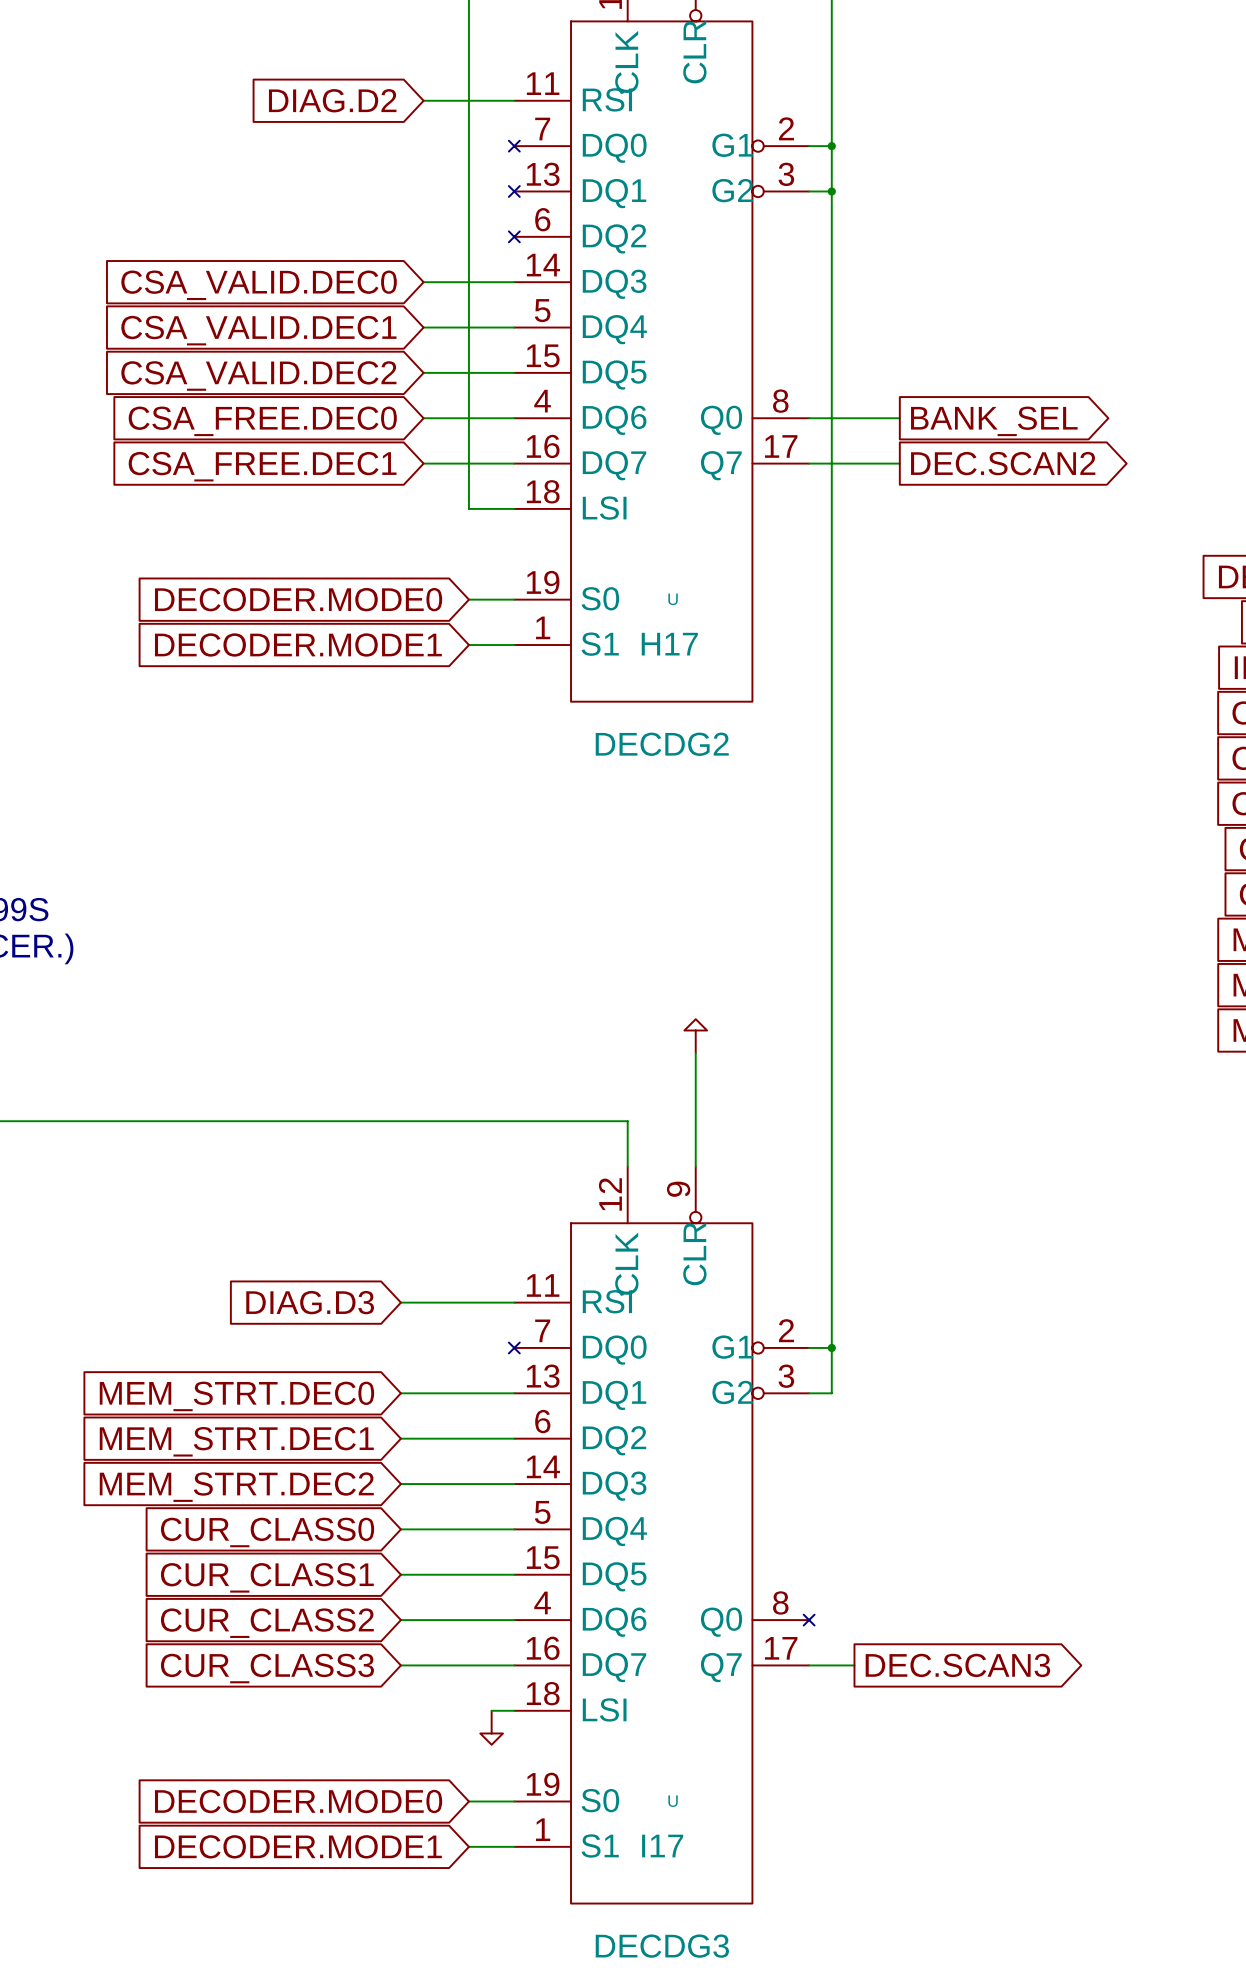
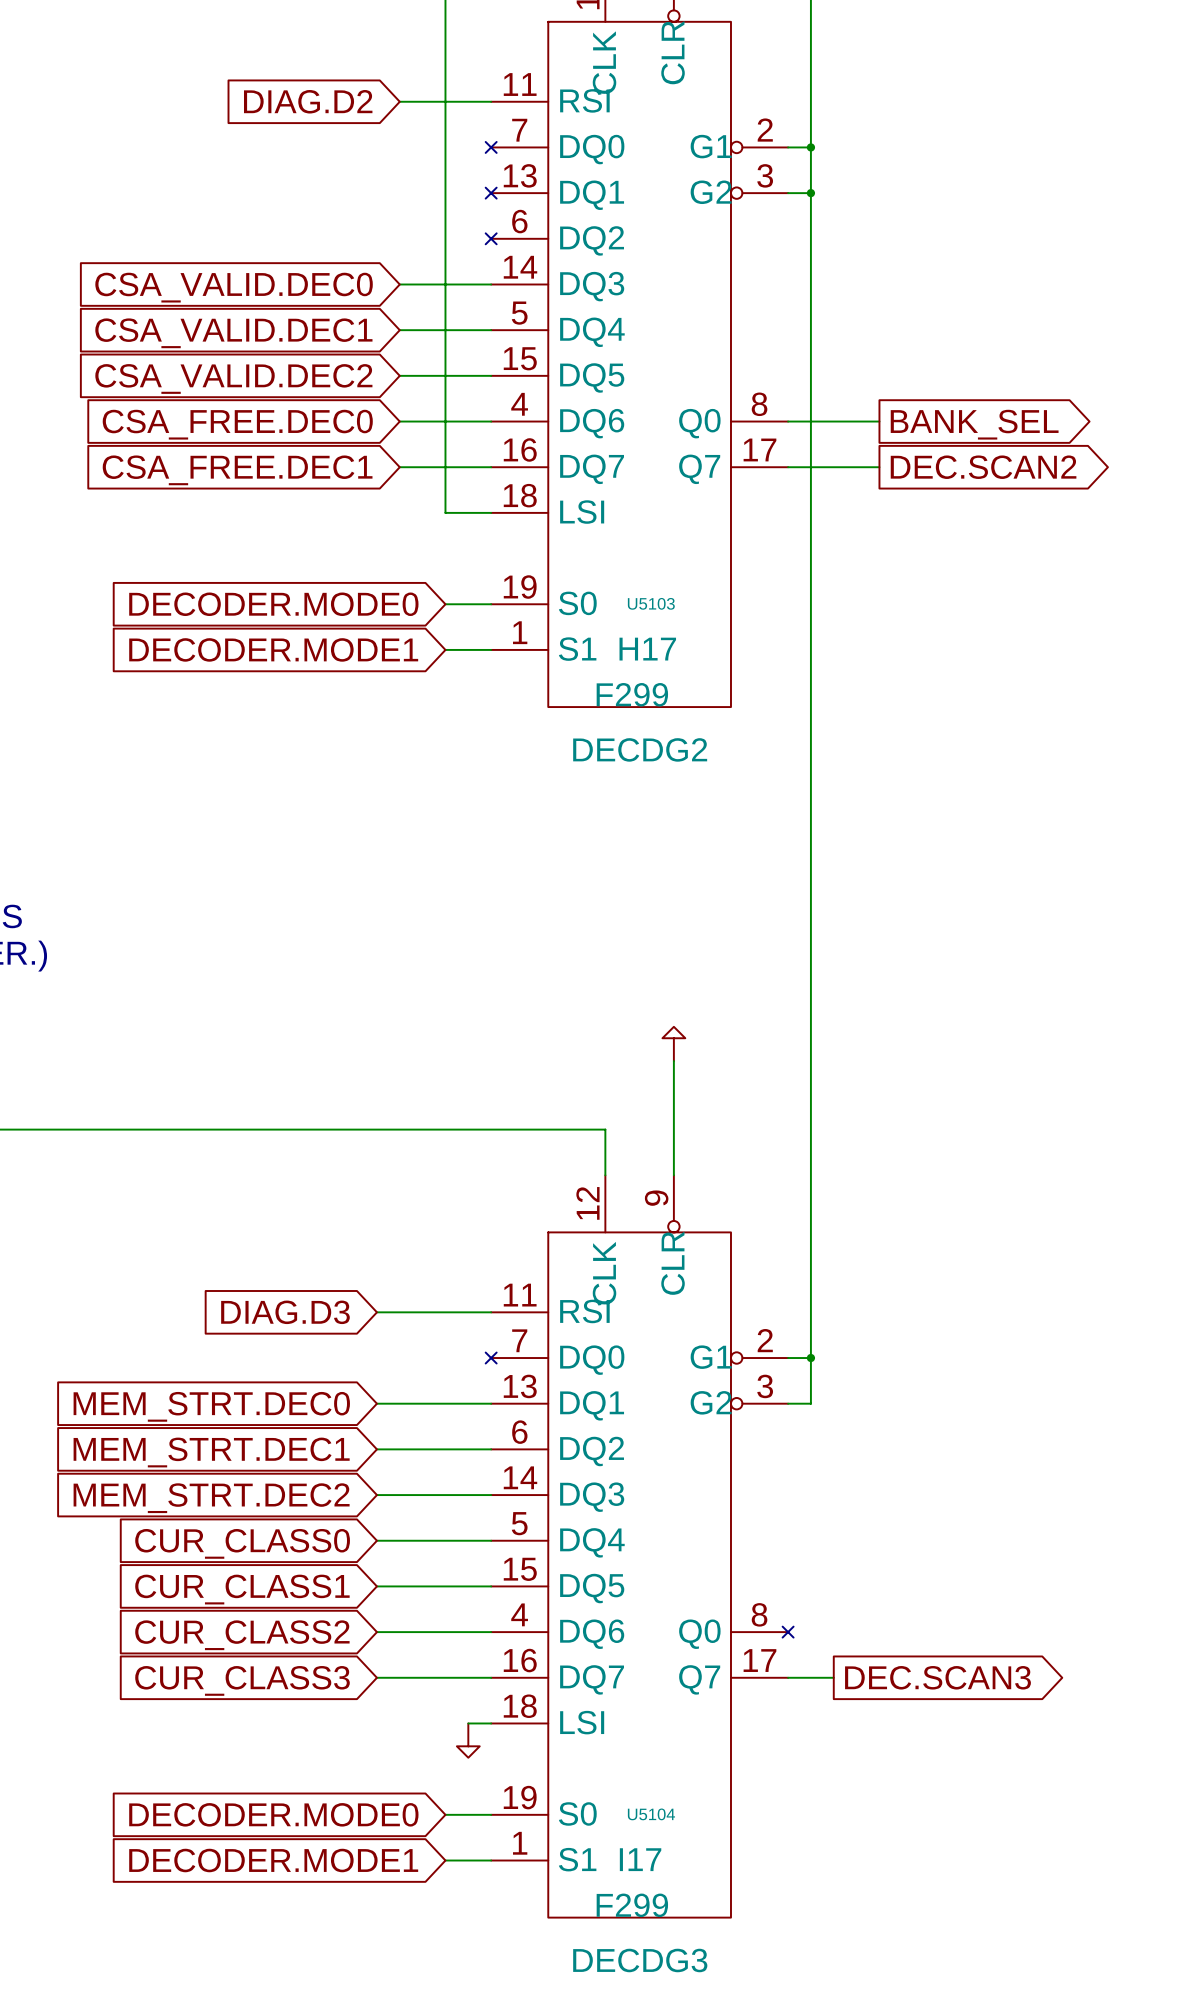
U name: U (673, 599) -> U5103 (651, 603)
U value: none -> F299 (632, 694)
U name: U (673, 1801) -> U5104 (651, 1814)
U value: none -> F299 (632, 1905)

